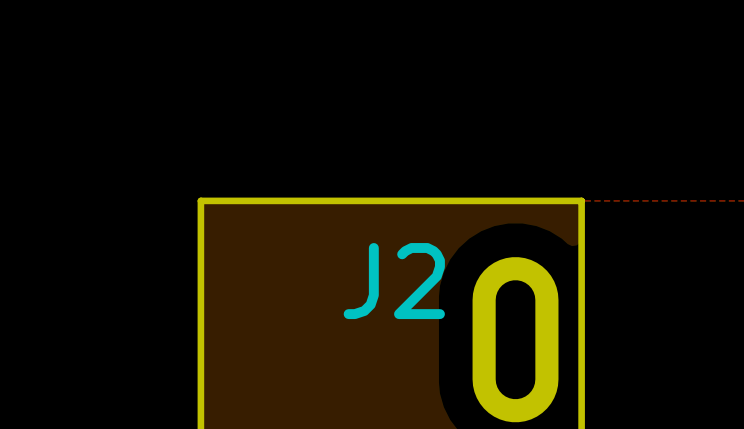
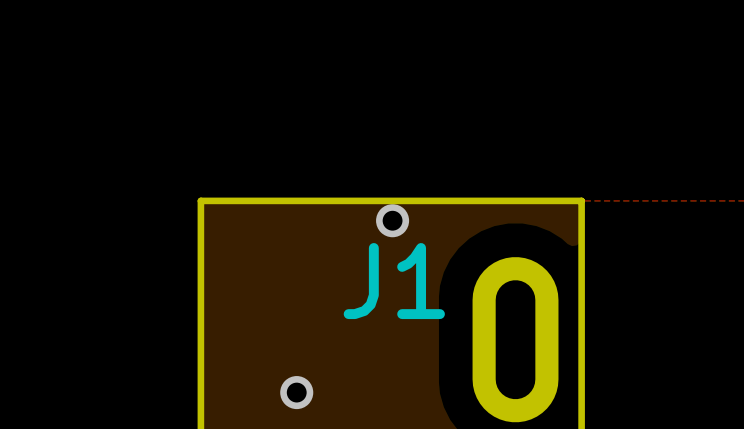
via: none -> (392, 220)
J2 name: J2 (394, 281) -> J1 (394, 281)
via: none -> (296, 392)

